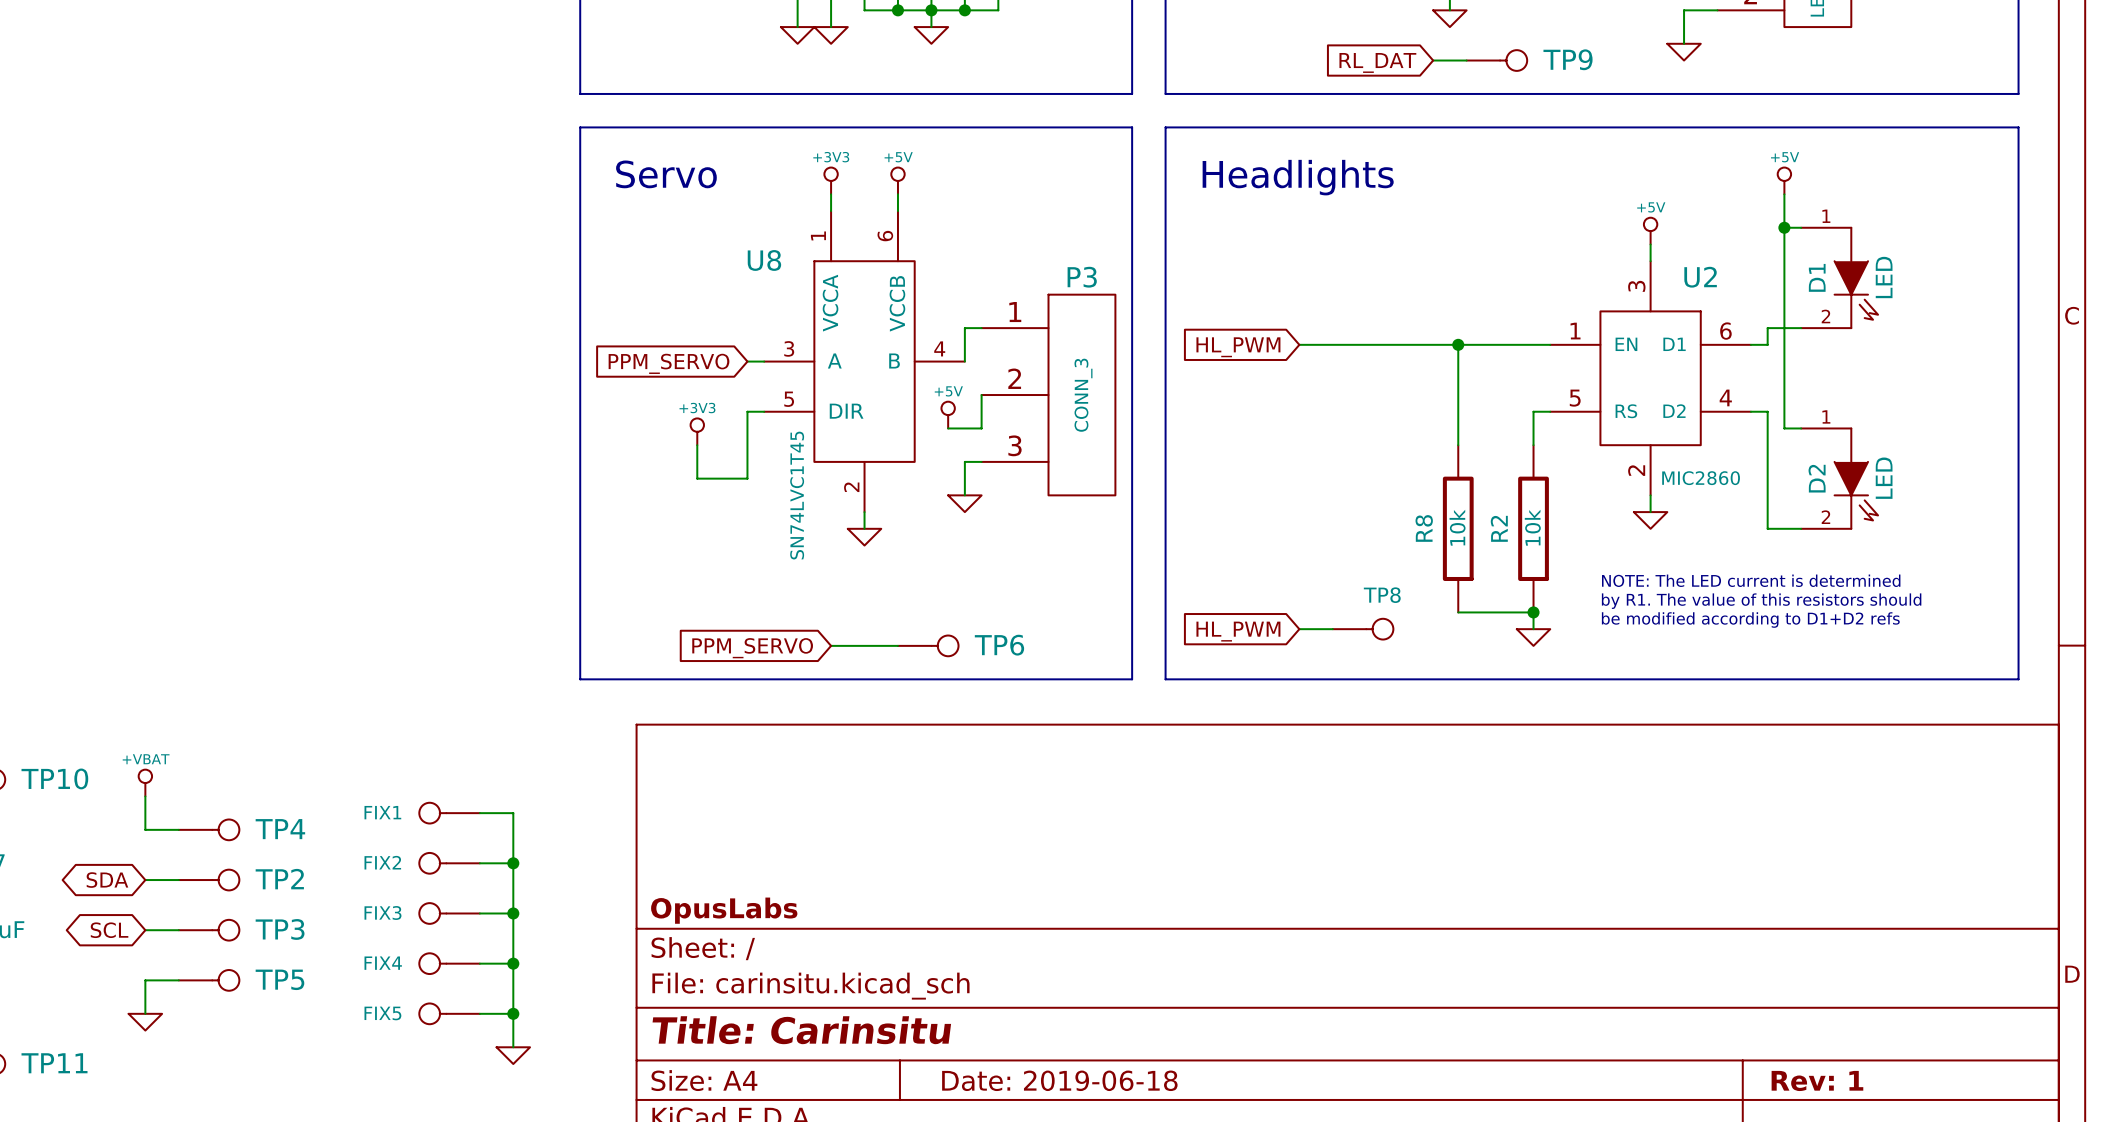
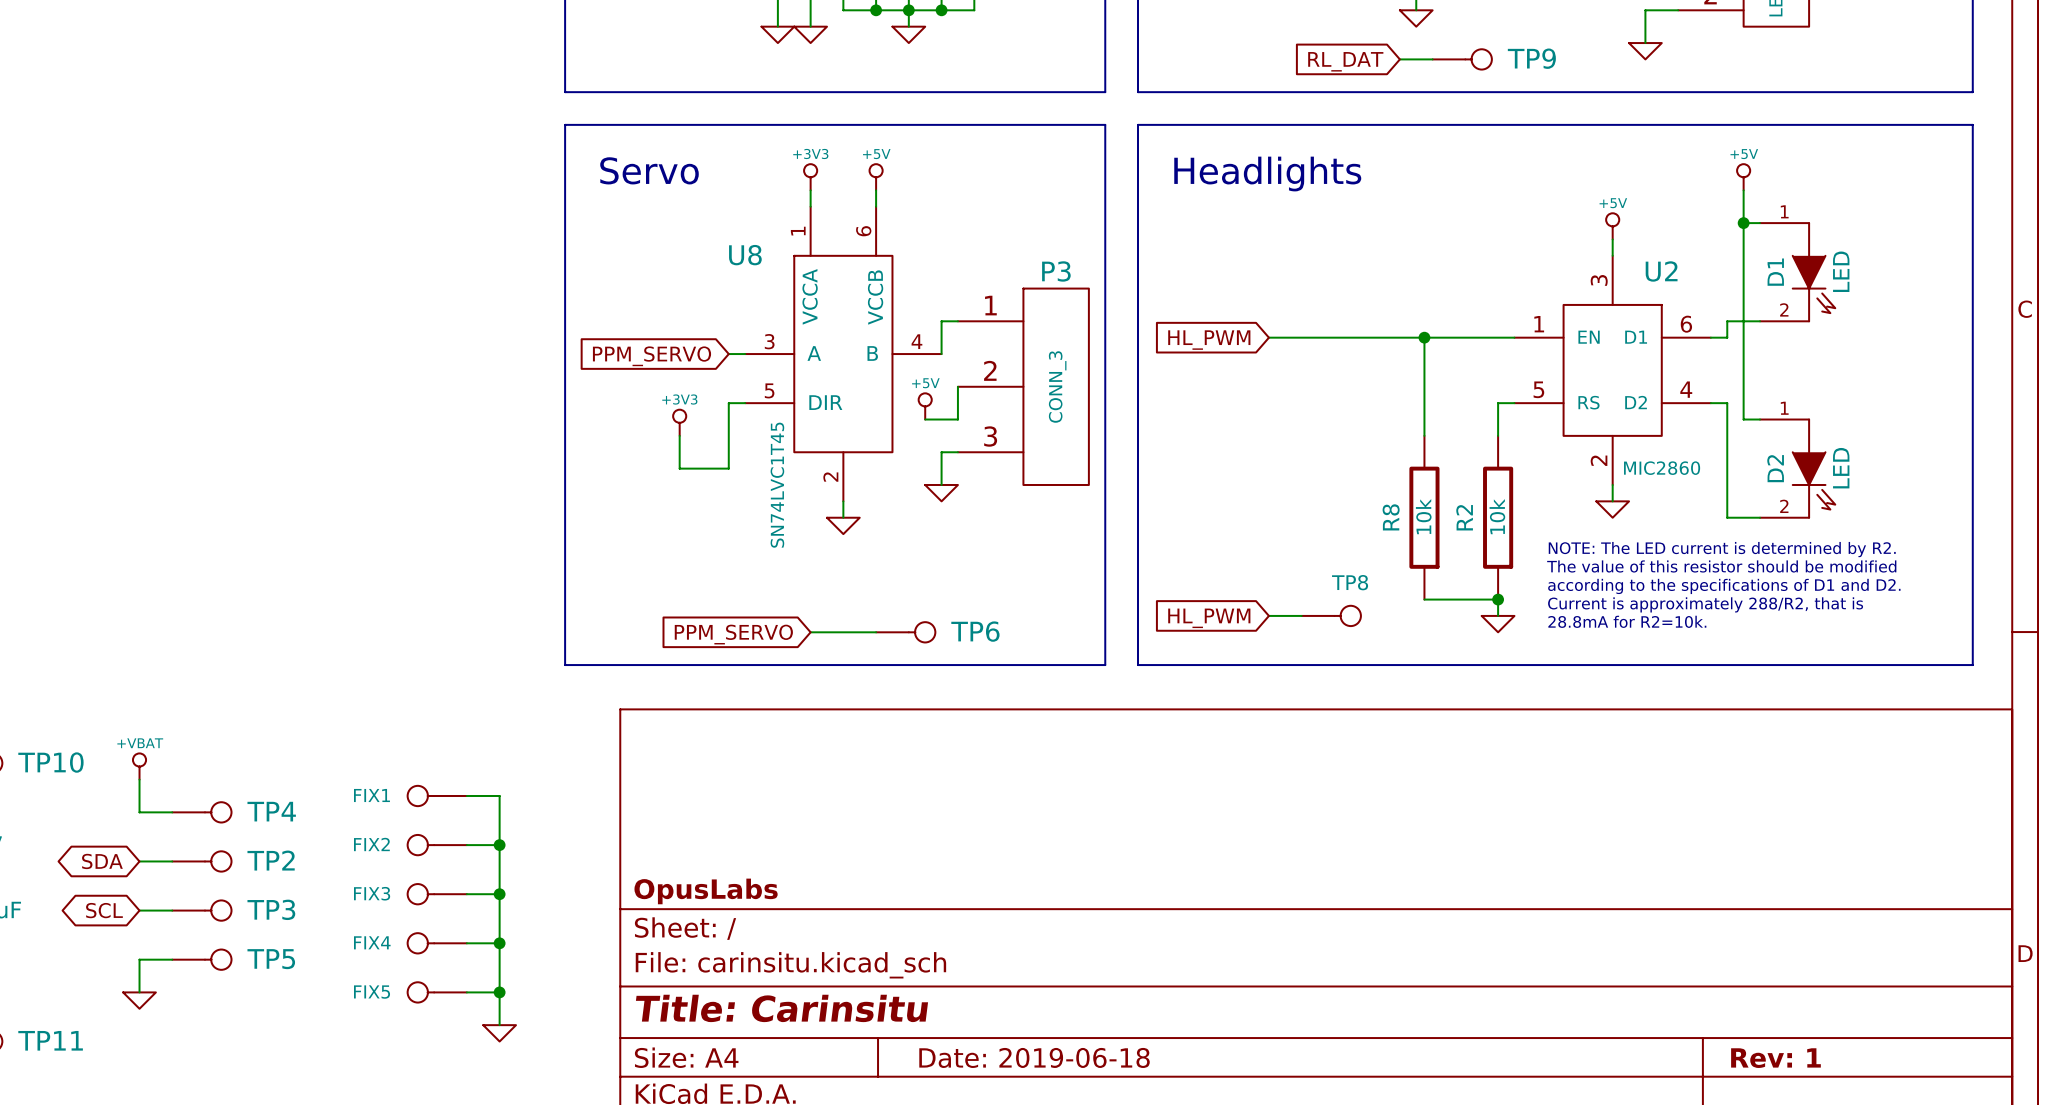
text: NOTE: The LED current is determined (1751, 580) -> NOTE: The LED current is determined by R2. (1722, 549)
text: none -> according to the specifications of D1 and D2. (1724, 586)
text: by R1. The value of this resistors should (1761, 601) -> The value of this resistor should be modified (1721, 566)
text: none -> Current is approximately 288/R2, that is (1705, 604)
text: be modified according to D1+D2 refs (1750, 620) -> none
text: none -> 28.8mA for R2=10k. (1627, 621)

